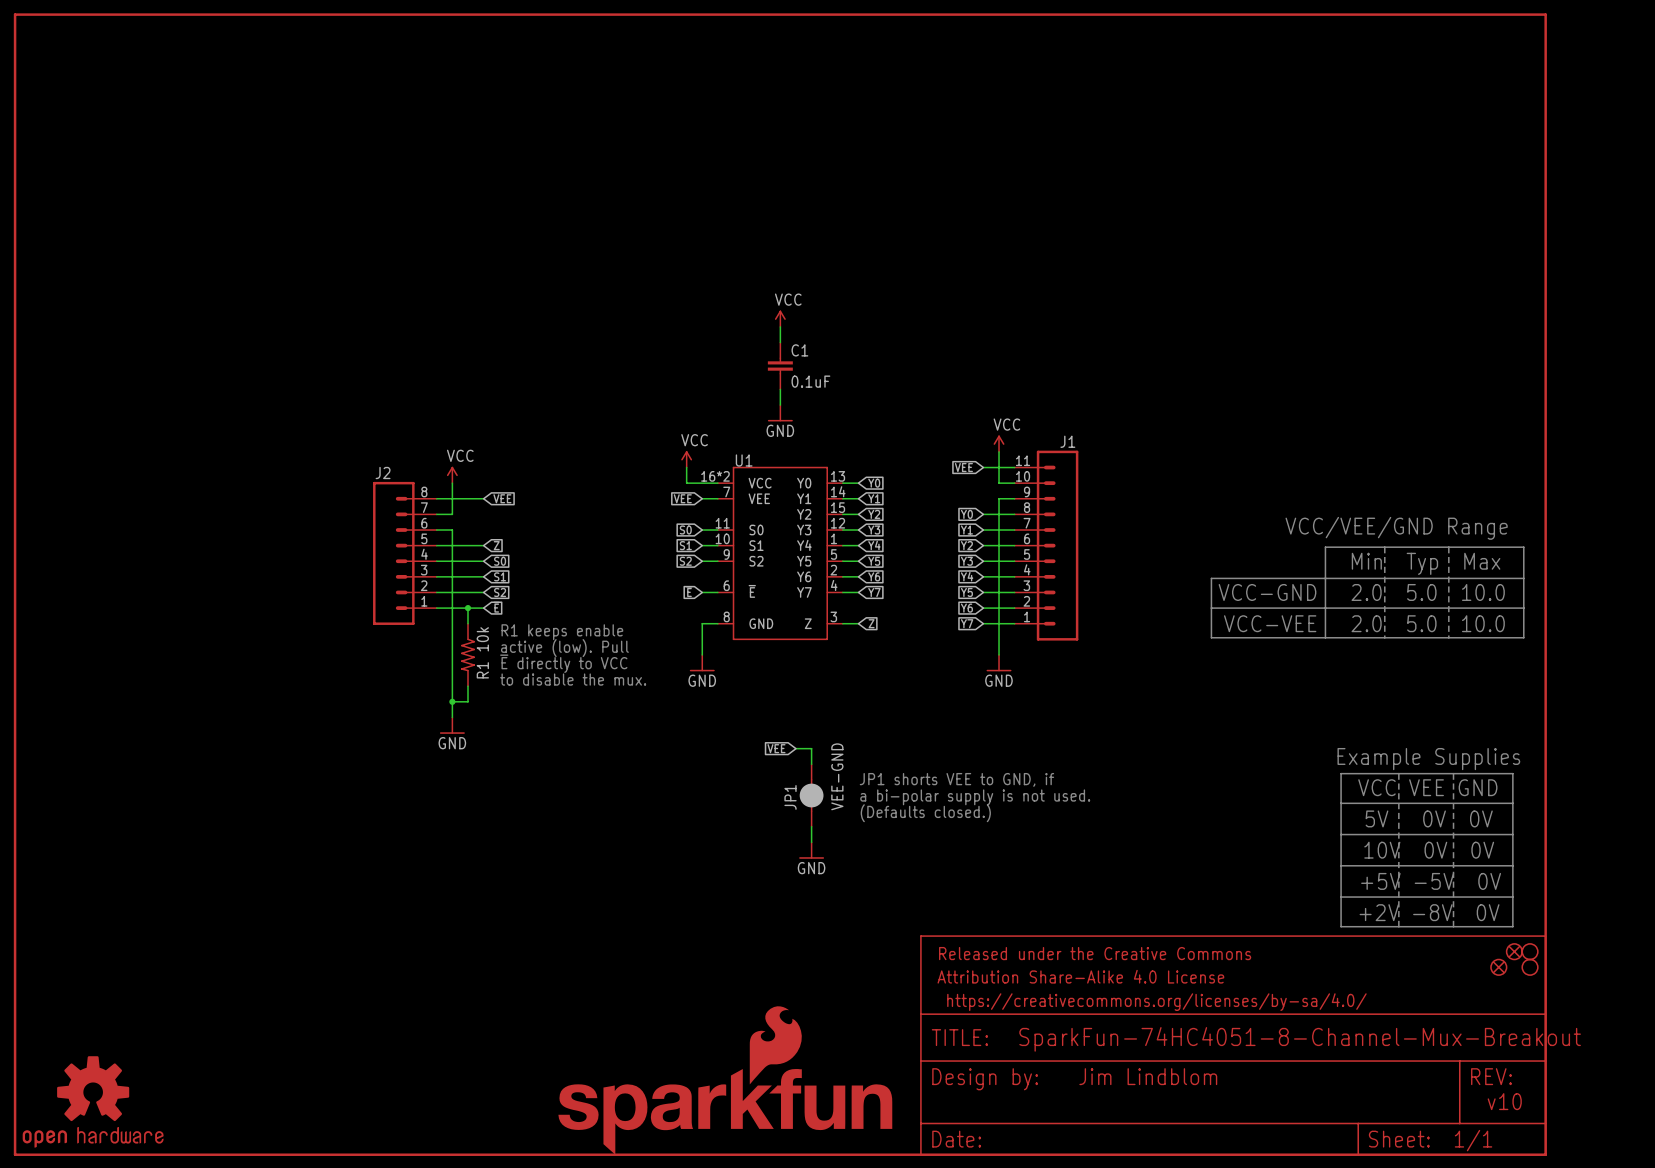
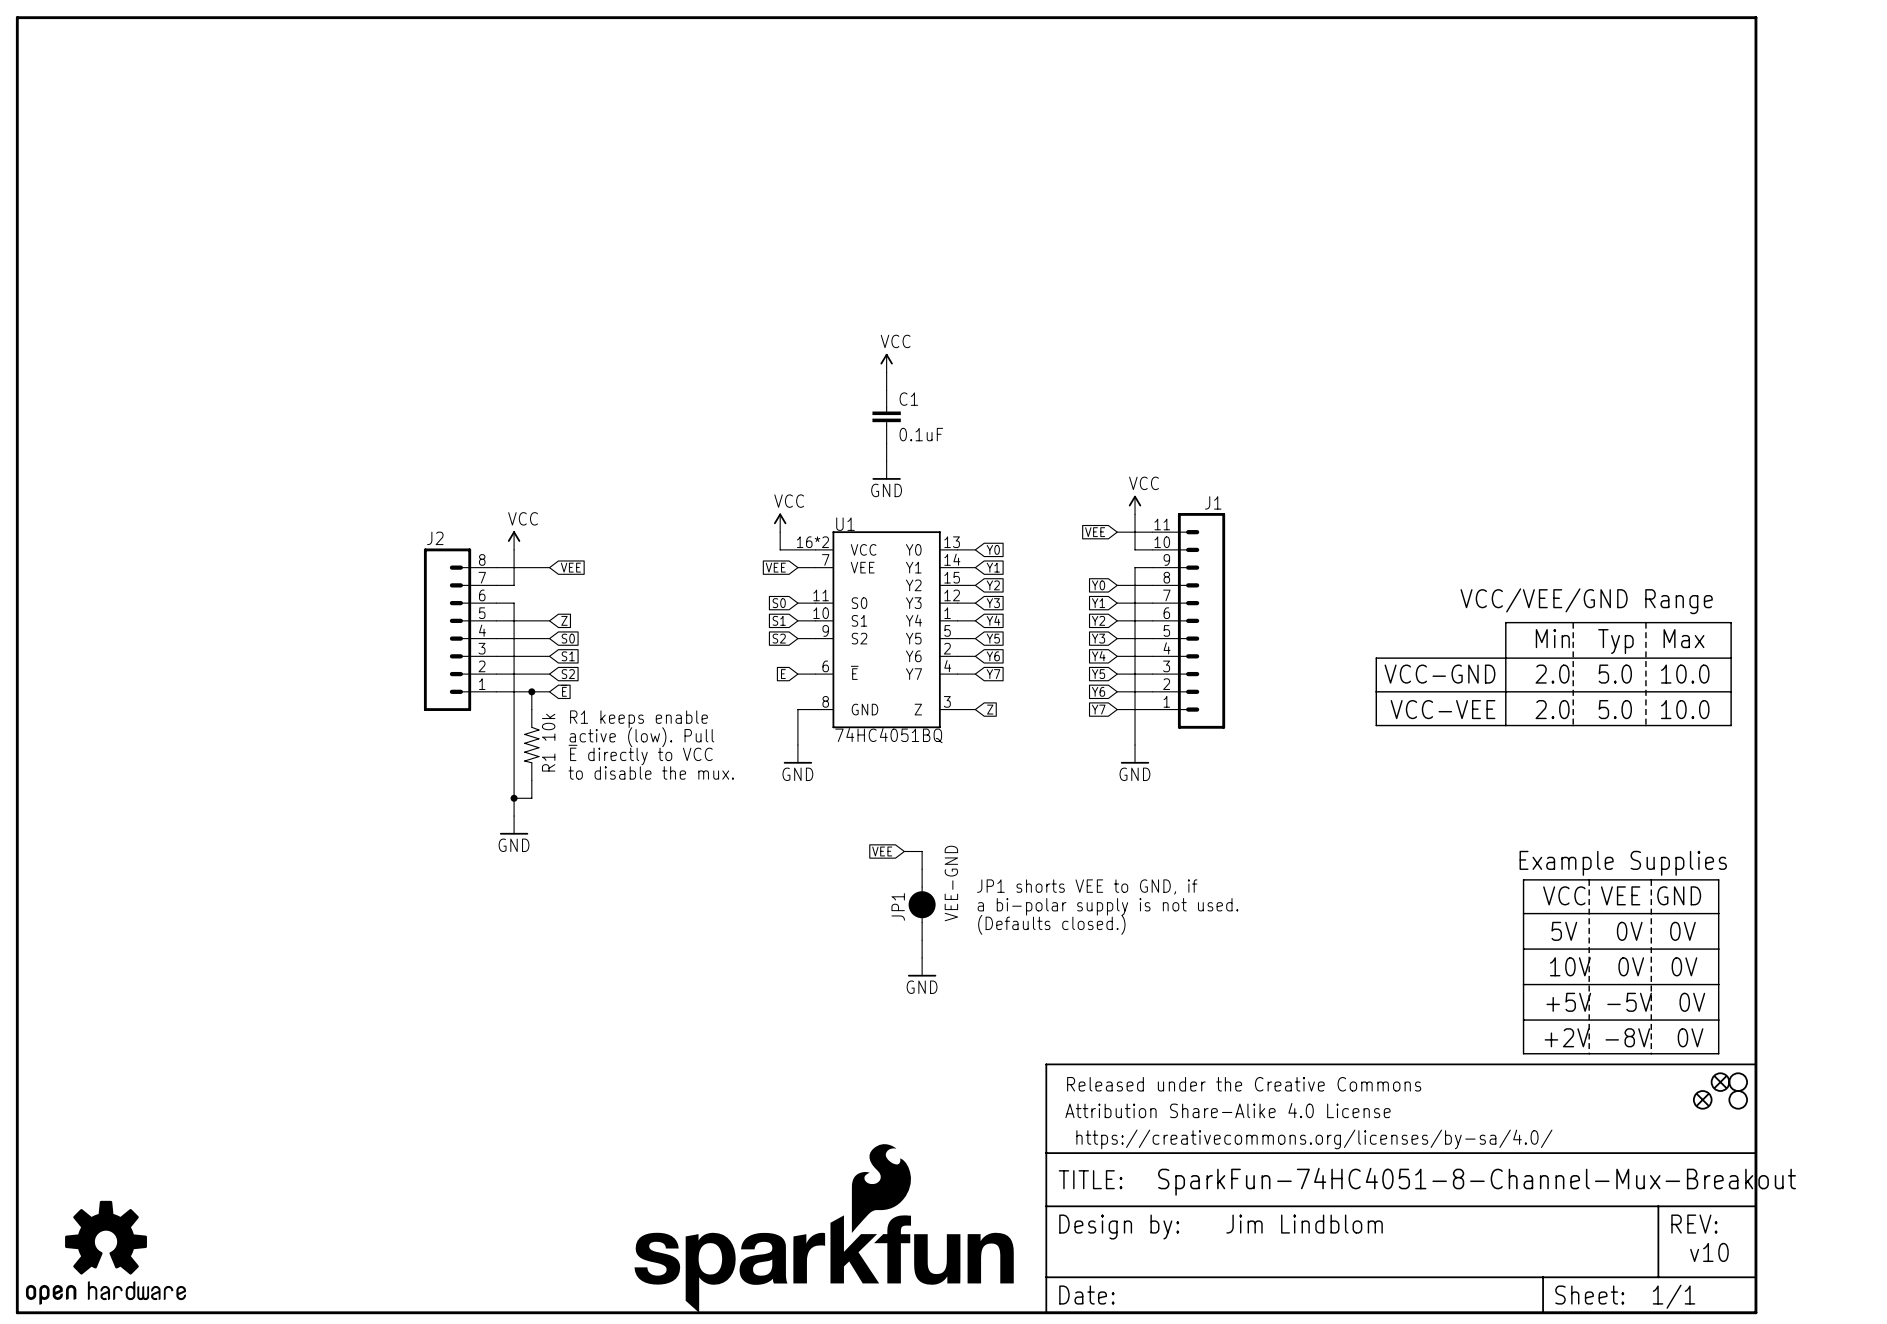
U1 value: none -> 74HC4051BQ (888, 735)

